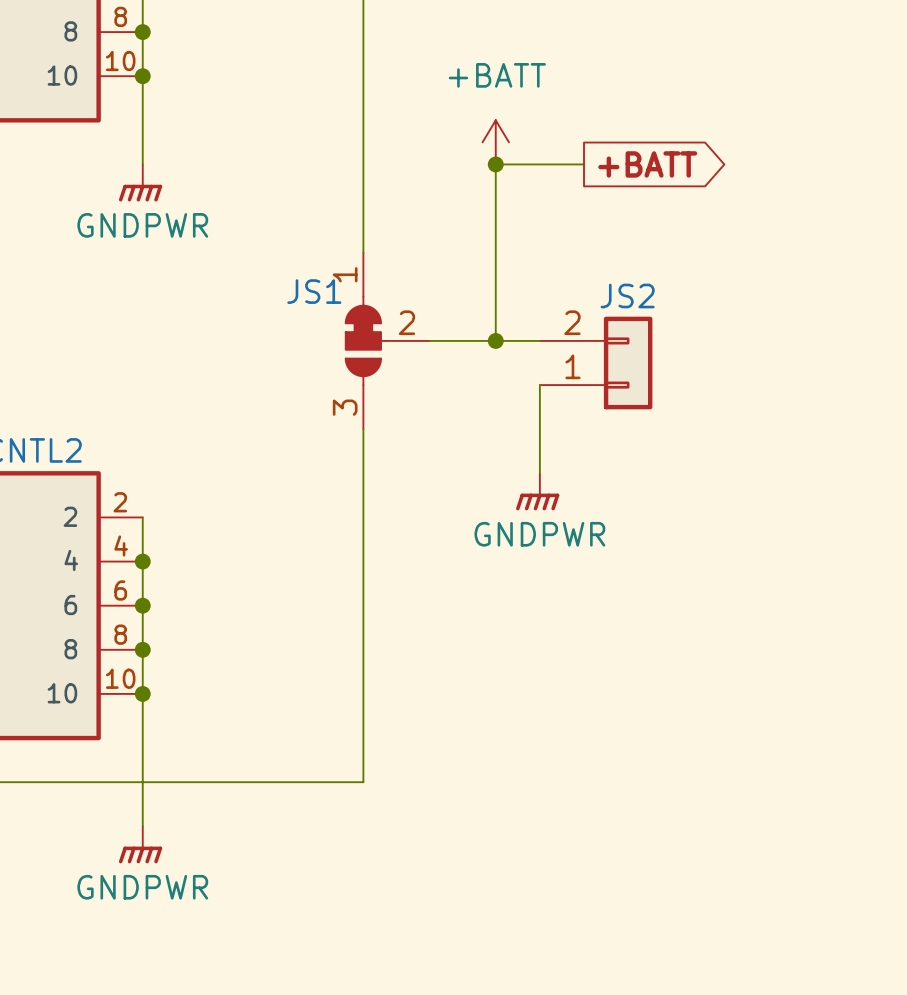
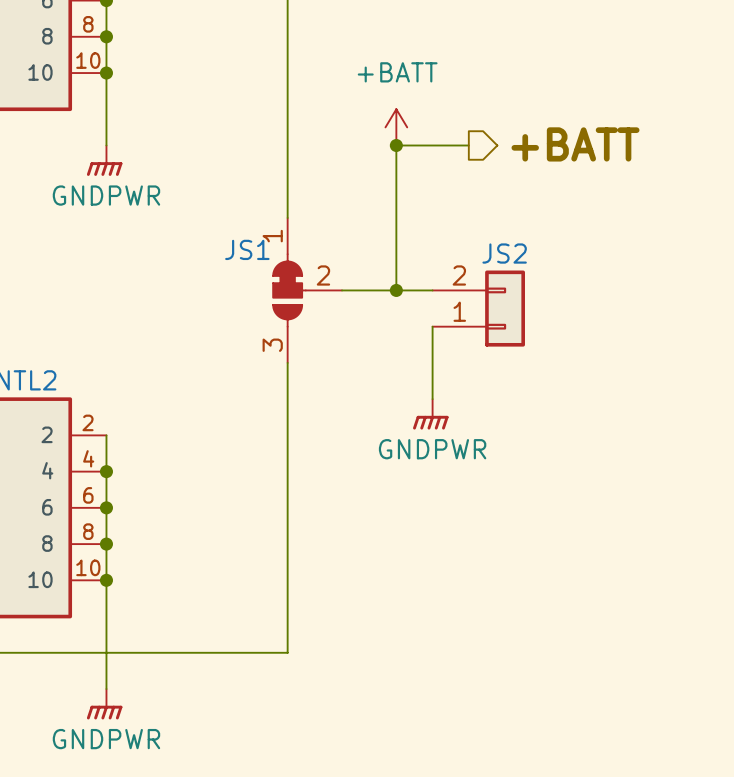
hierarchical label: none -> +BATT (575, 144)
global label: +BATT (647, 164) -> none

